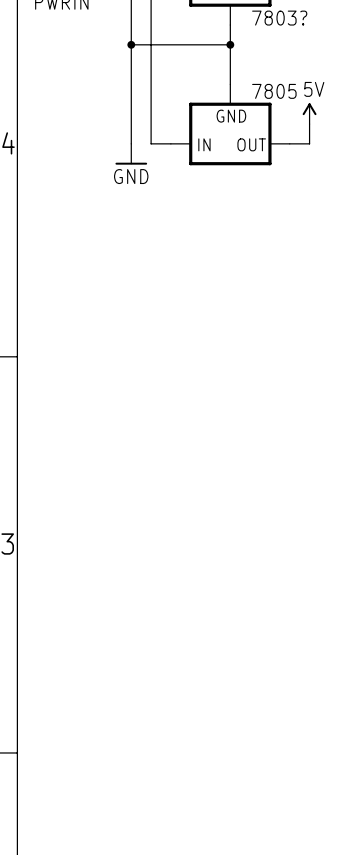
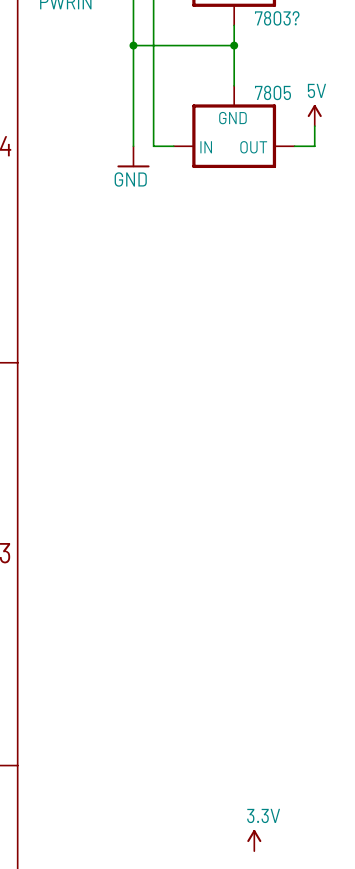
power symbol: none -> 3.3V (254, 840)

